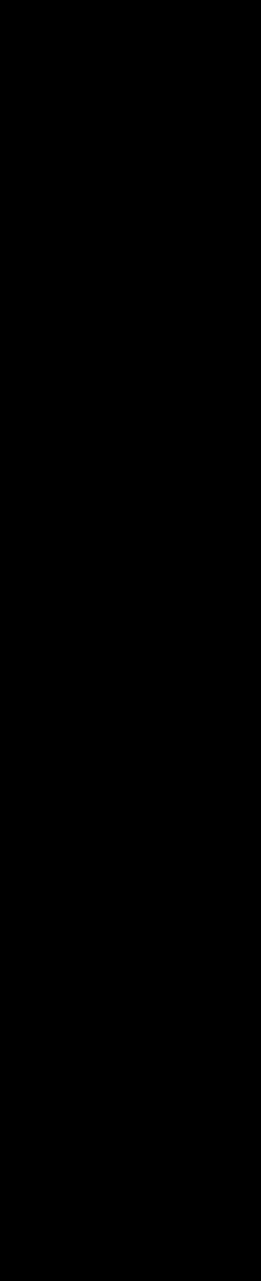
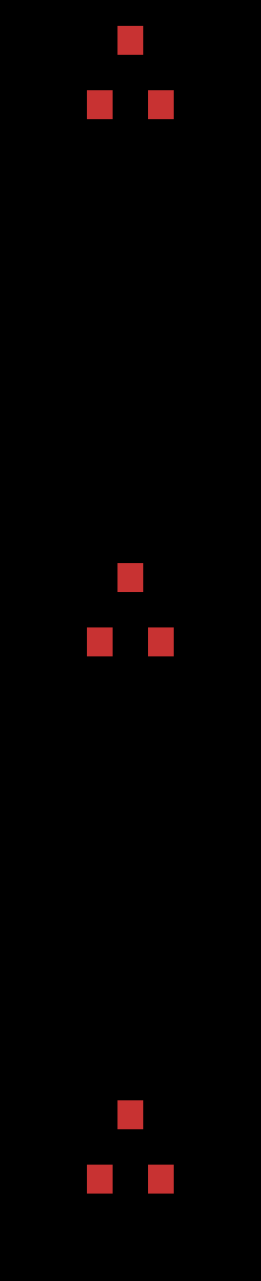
part: none -> (130, 72)
part: none -> (130, 609)
part: none -> (130, 1146)

